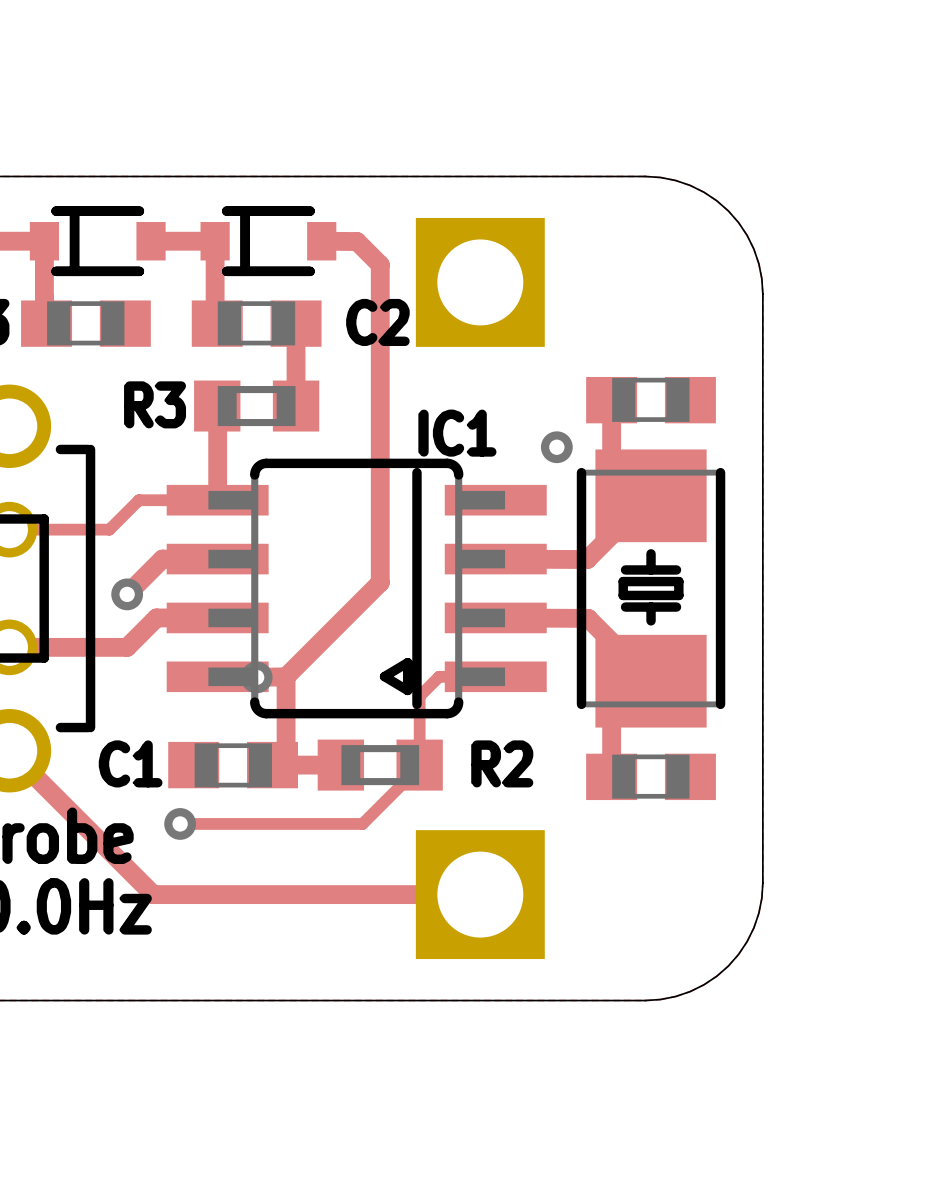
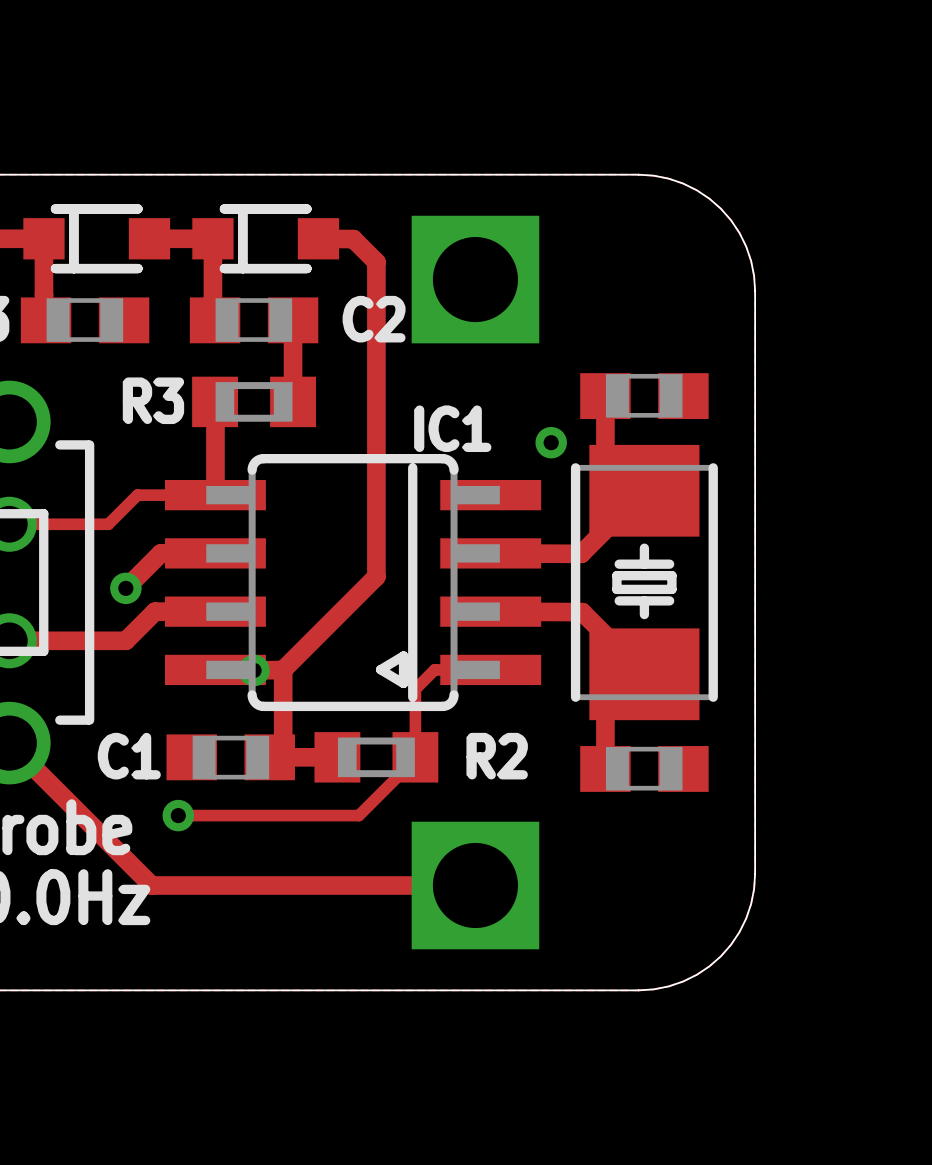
part footprint: [29, 206, 166, 277] -> [23, 204, 171, 274]
part footprint: [200, 206, 337, 277] -> [192, 204, 340, 274]

